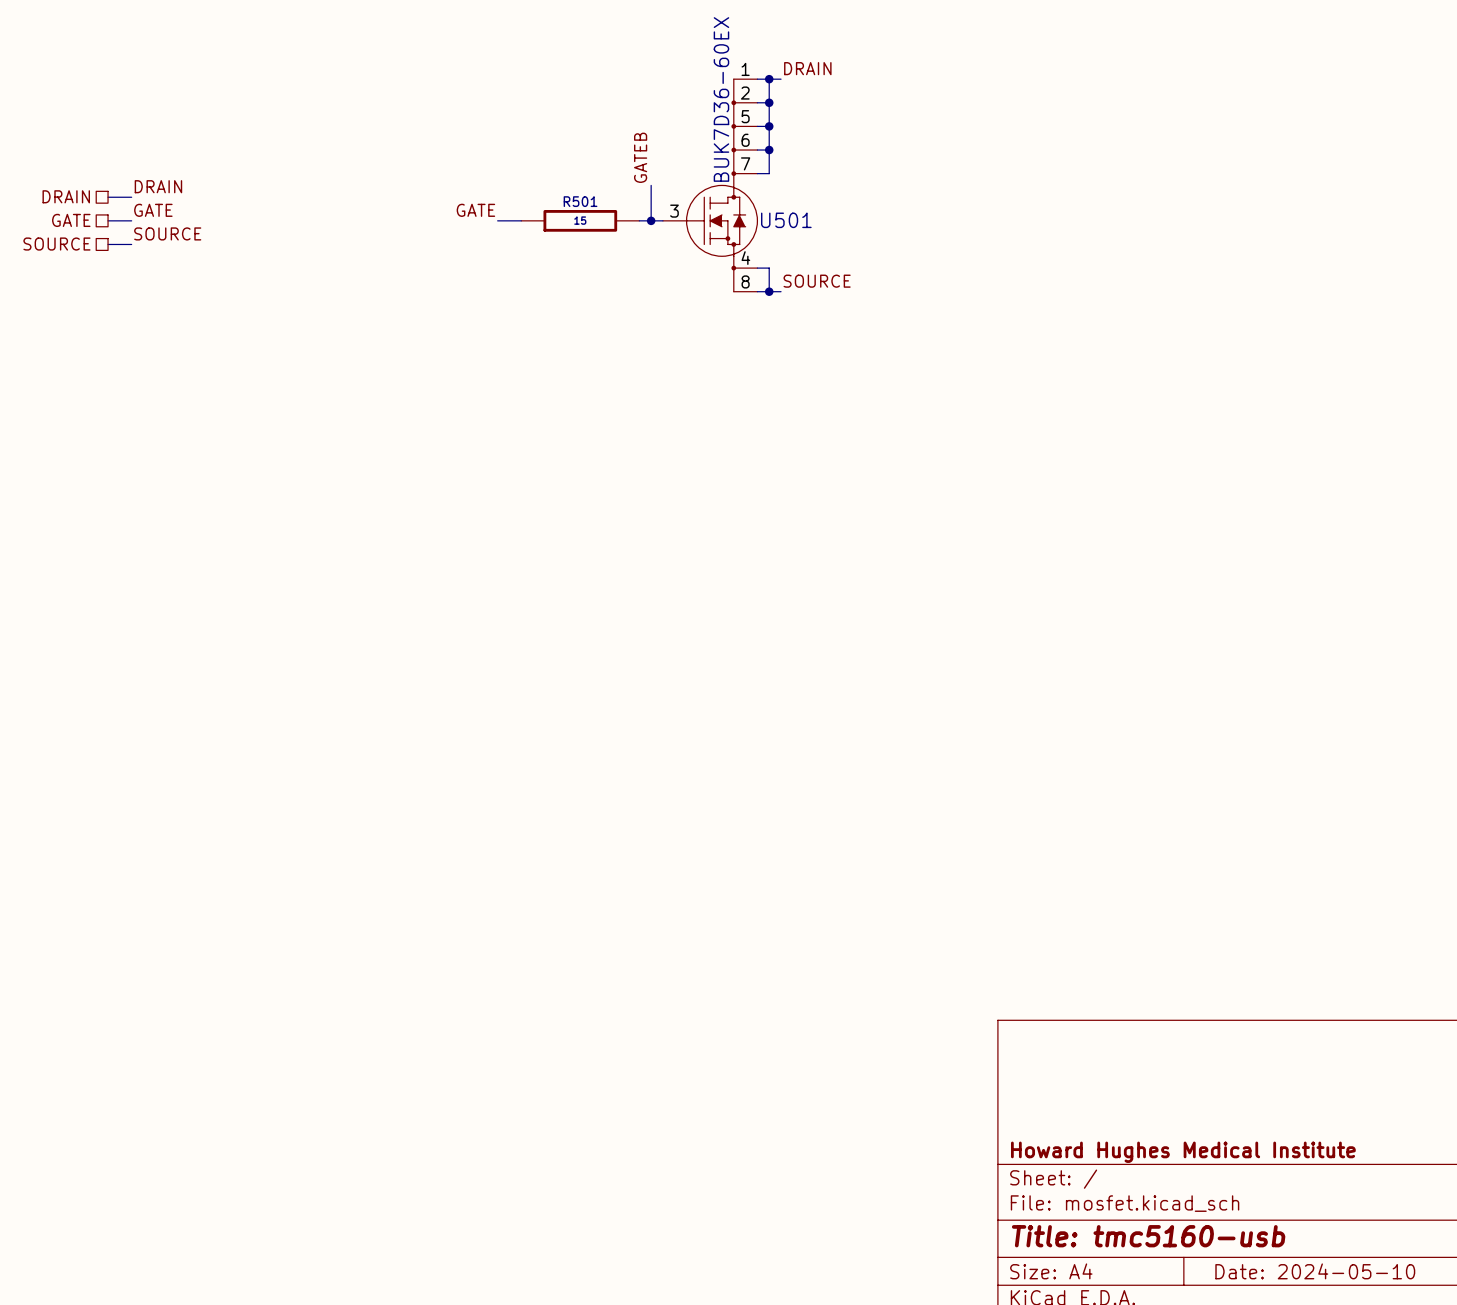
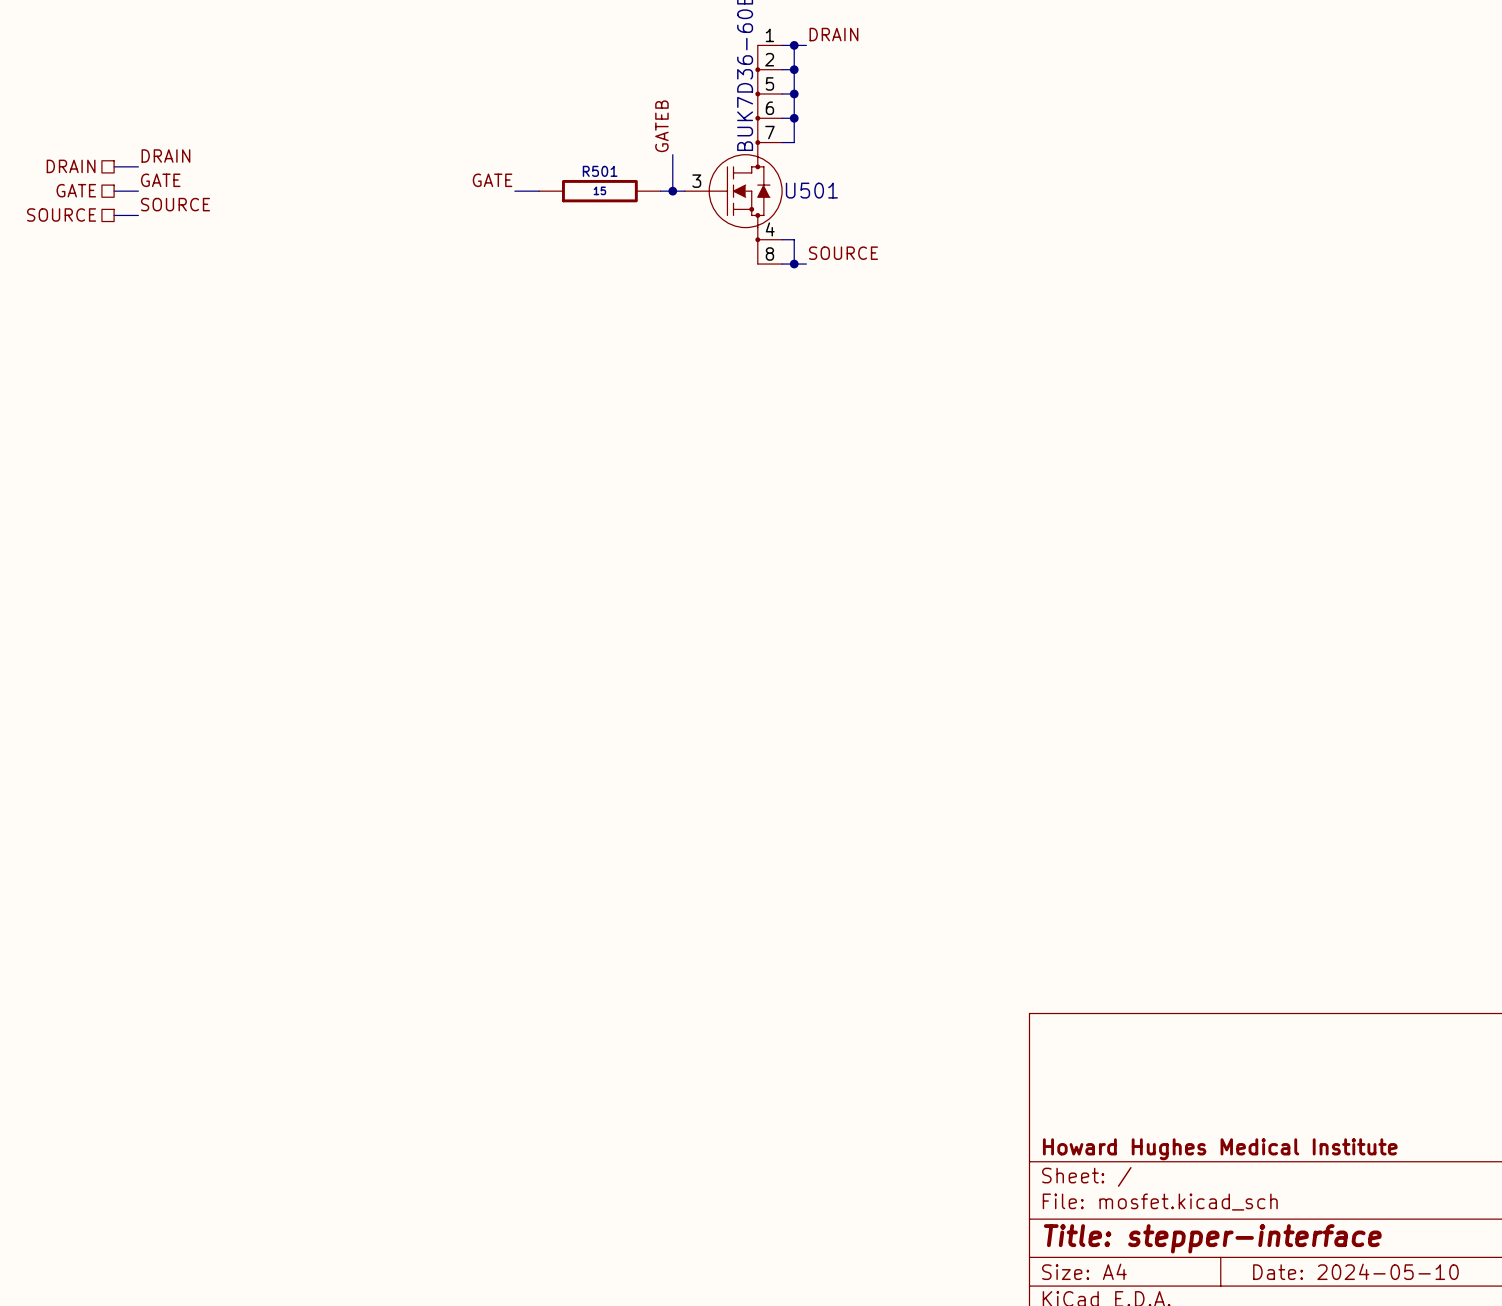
title block: Title: tmc5160-usb (1148, 1236) -> Title: stepper-interface (1212, 1238)

